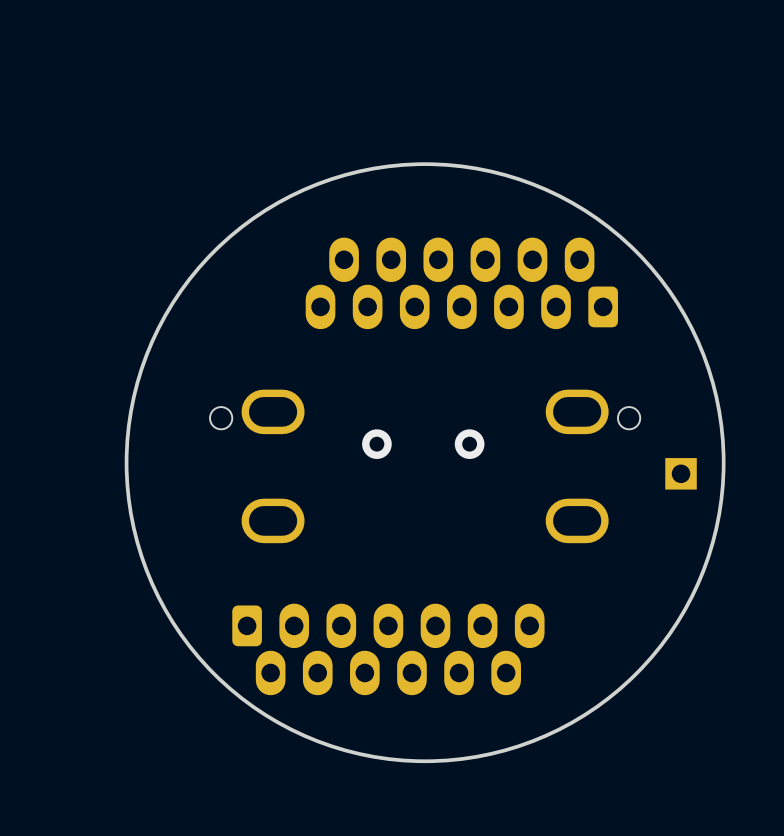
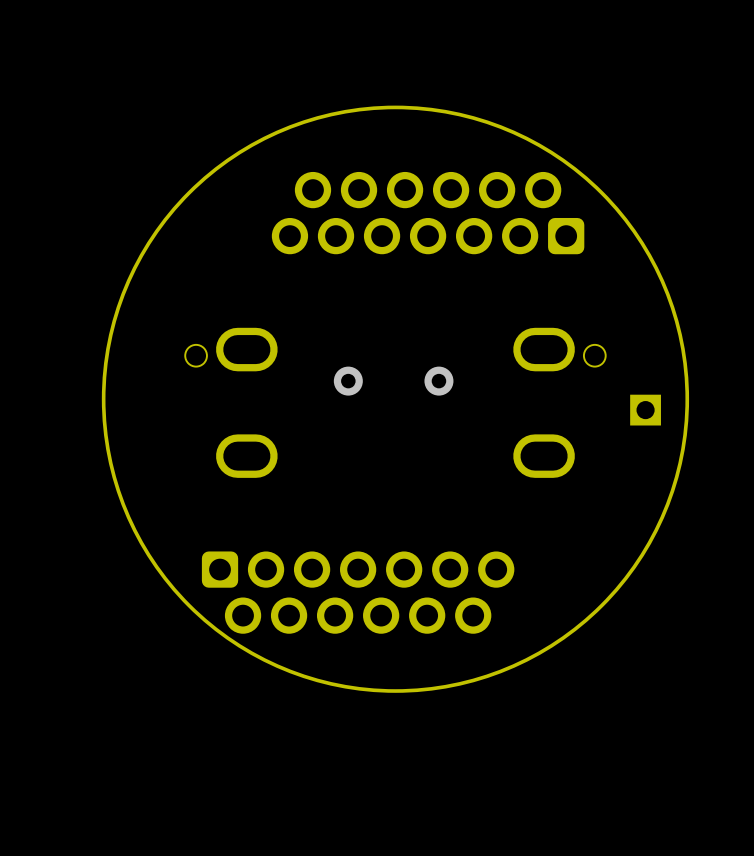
part footprint: [305, 237, 618, 330] -> [271, 171, 585, 255]
part footprint: [232, 603, 545, 696] -> [201, 551, 515, 634]

